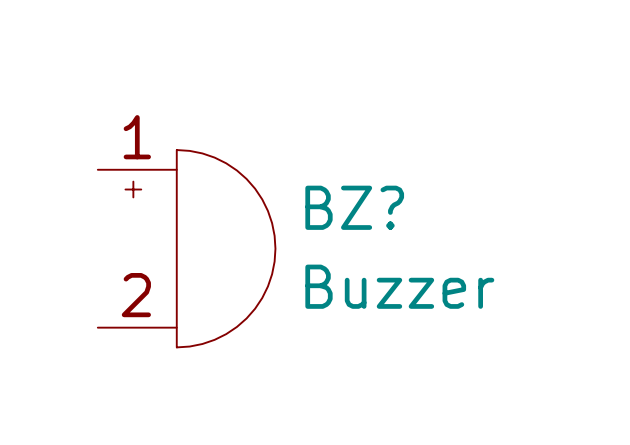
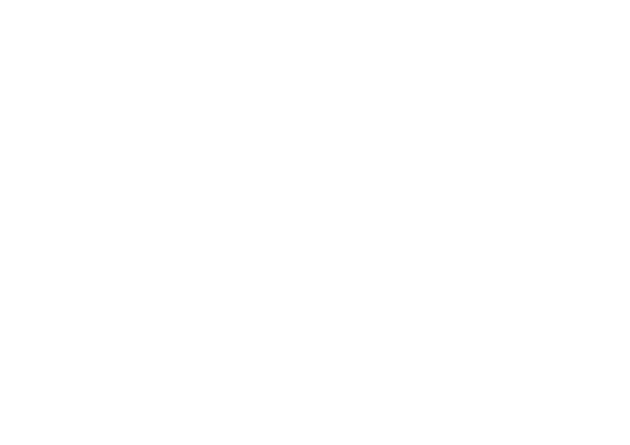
BZ?: Buzzer (186, 248) -> none

